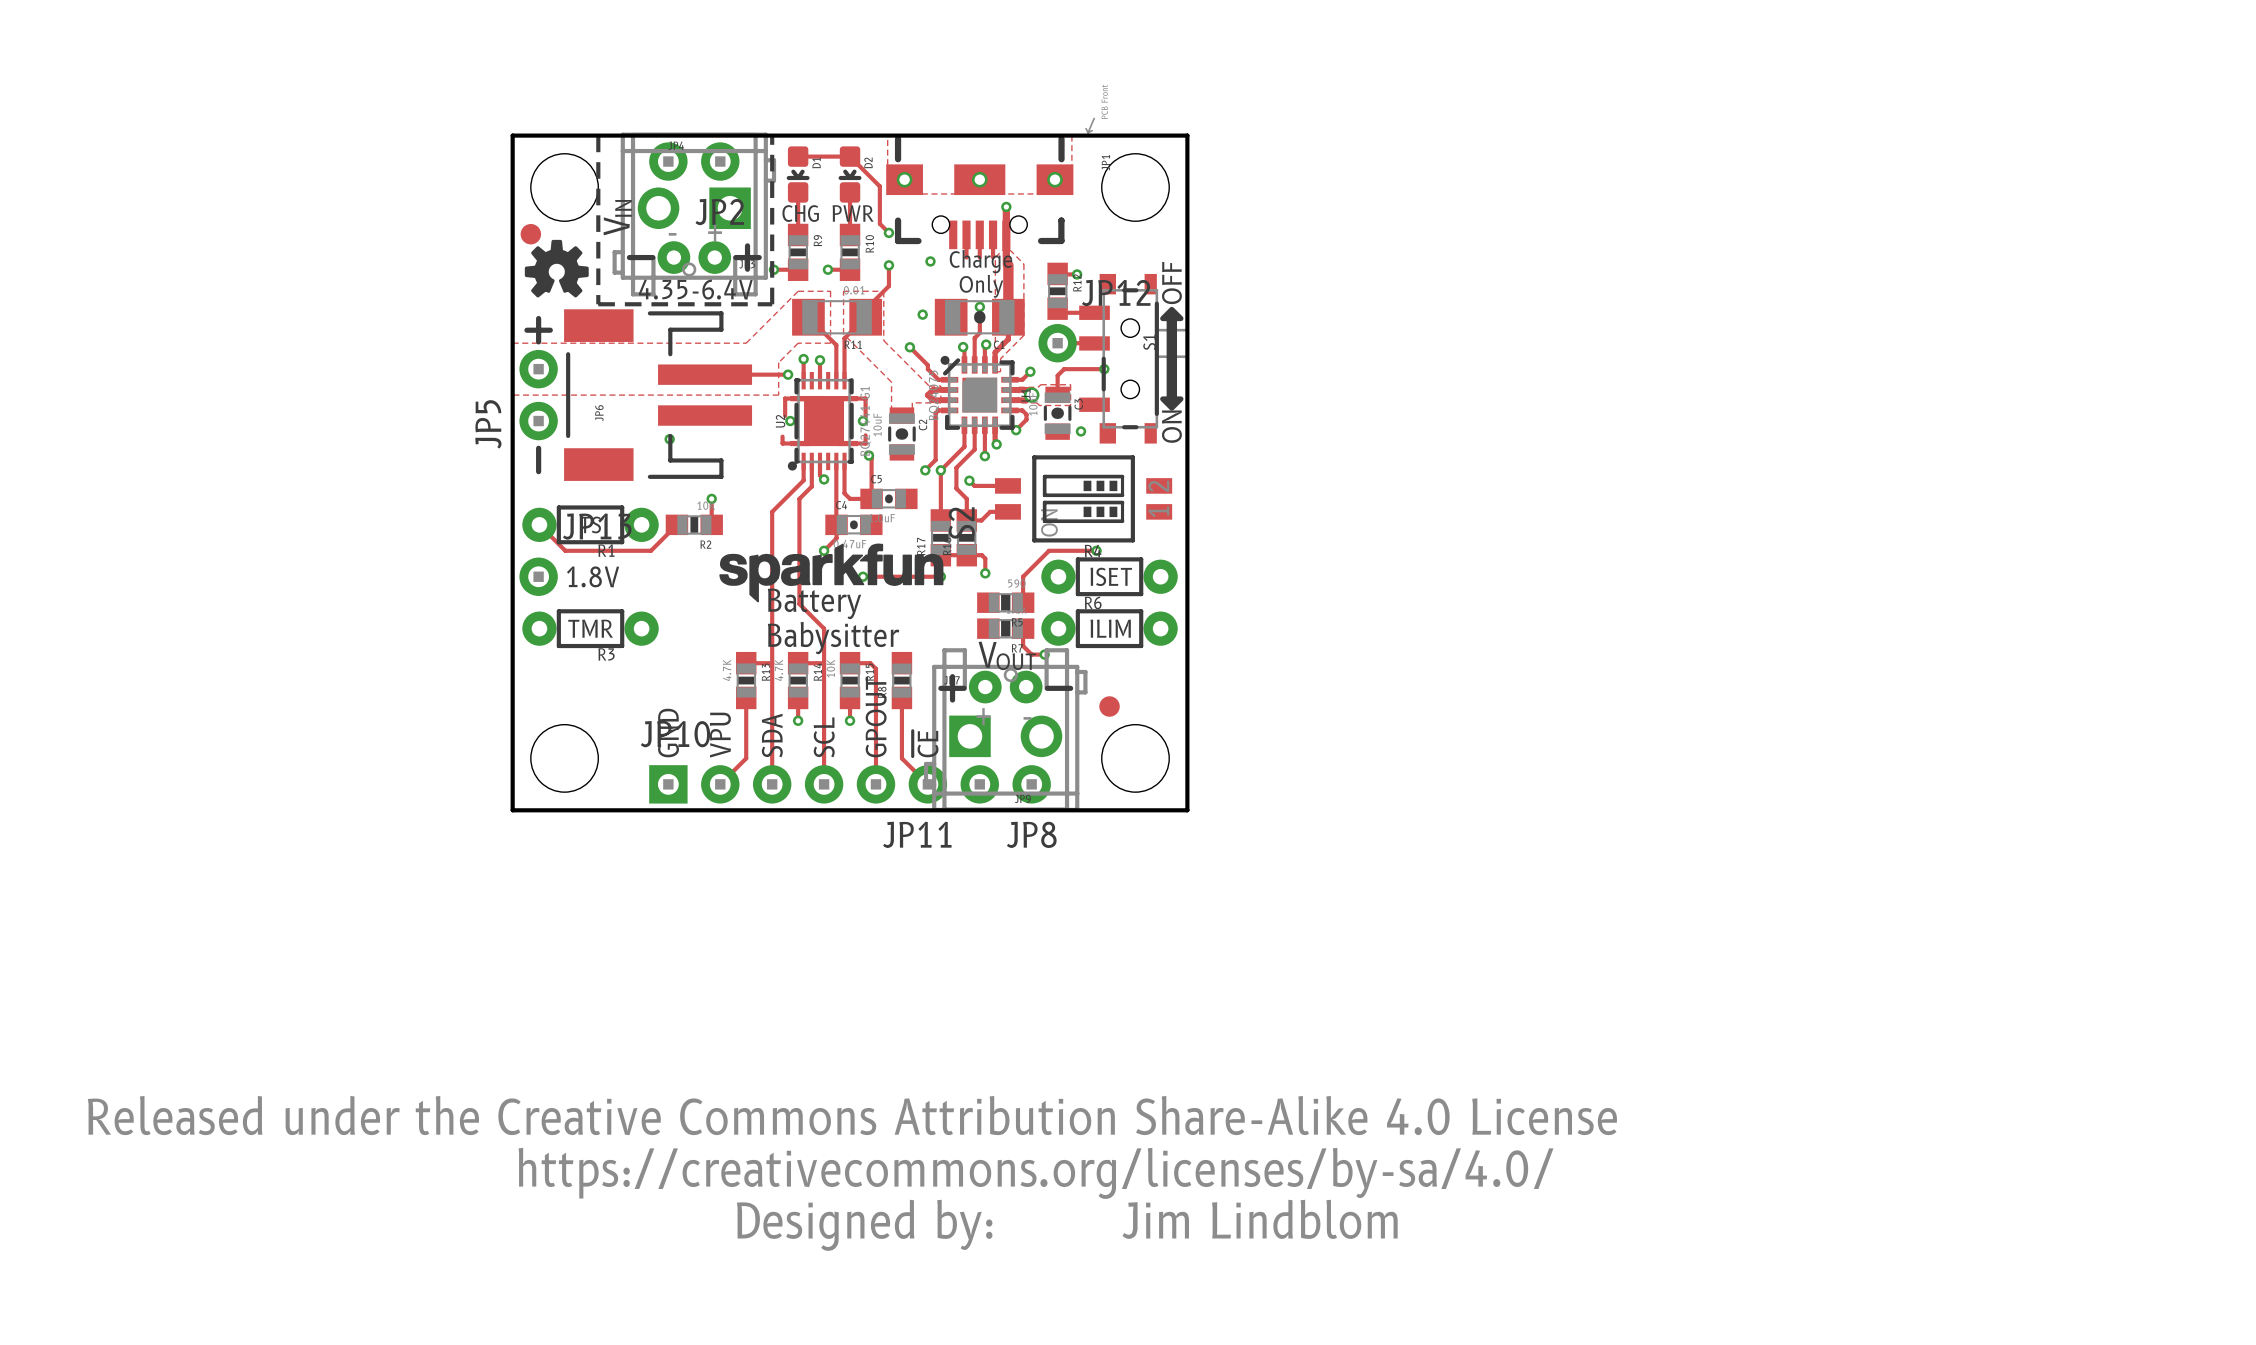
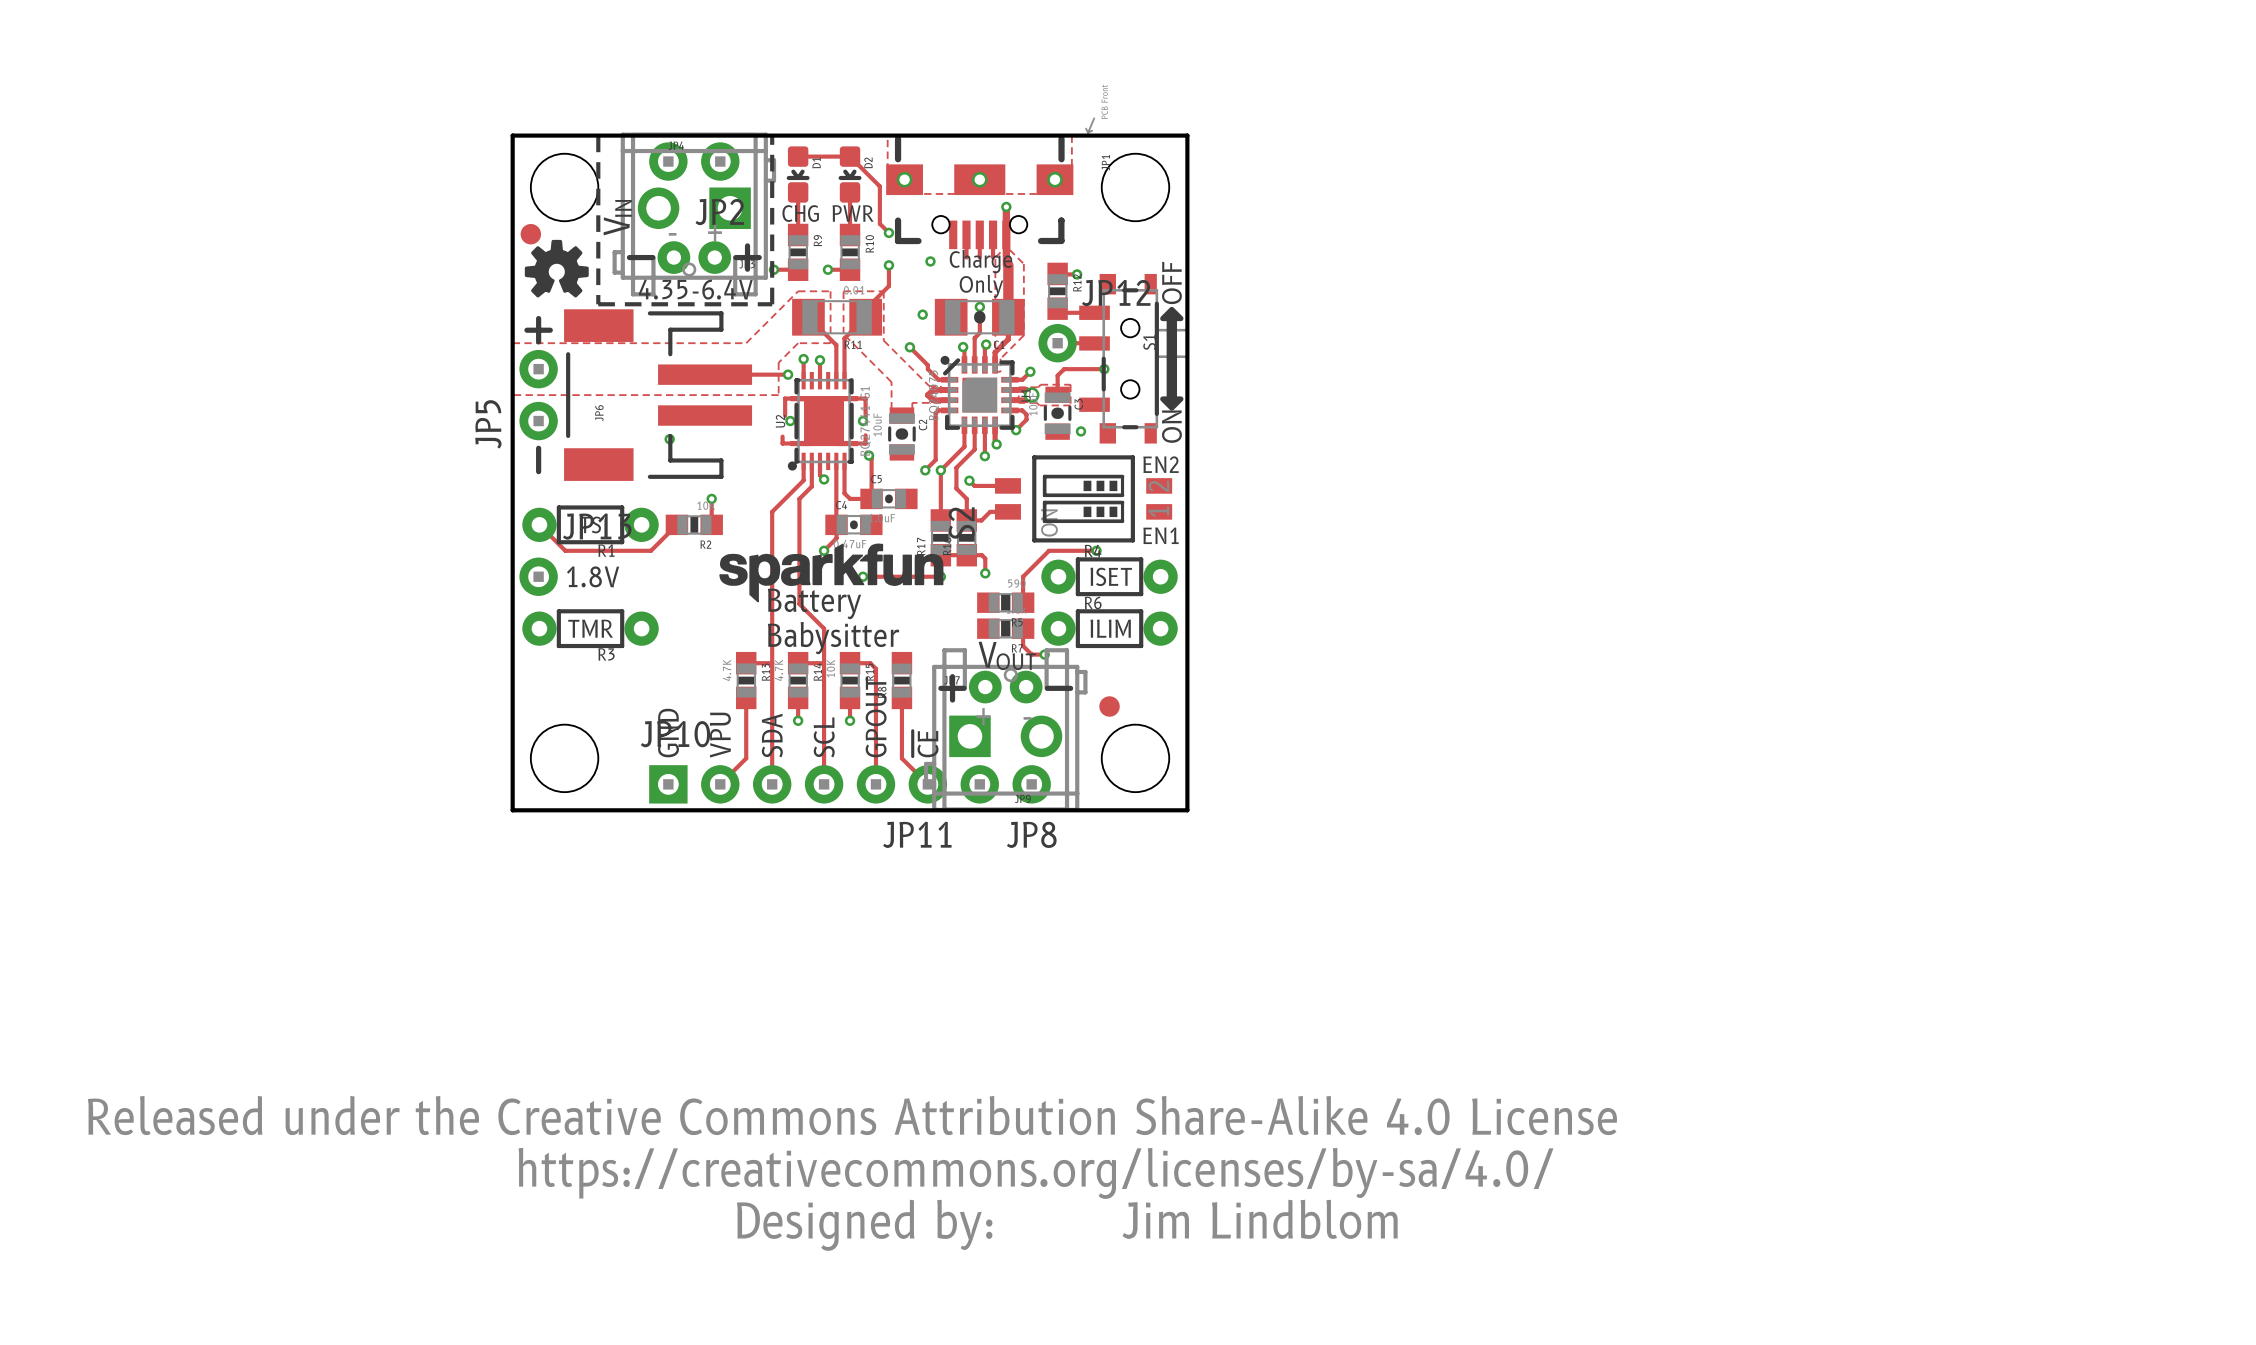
text: none -> EN2 (1161, 464)
text: none -> EN1 (1160, 535)

